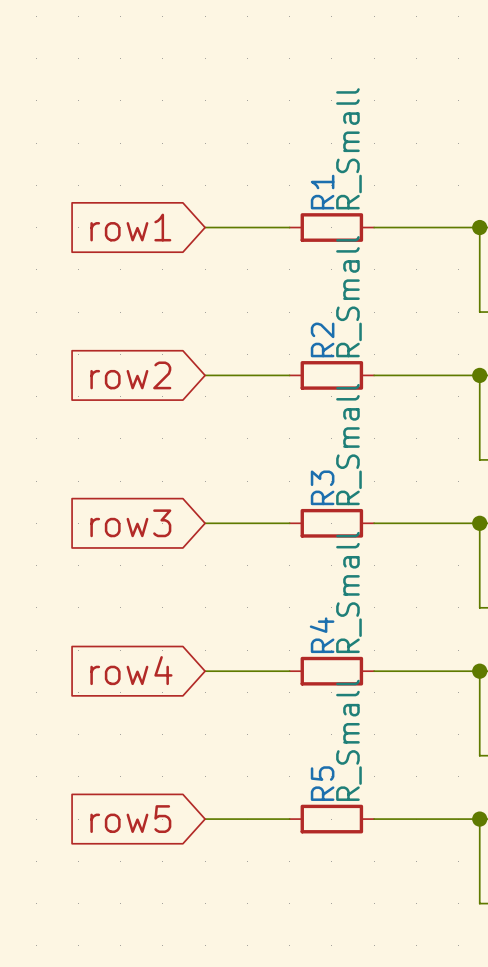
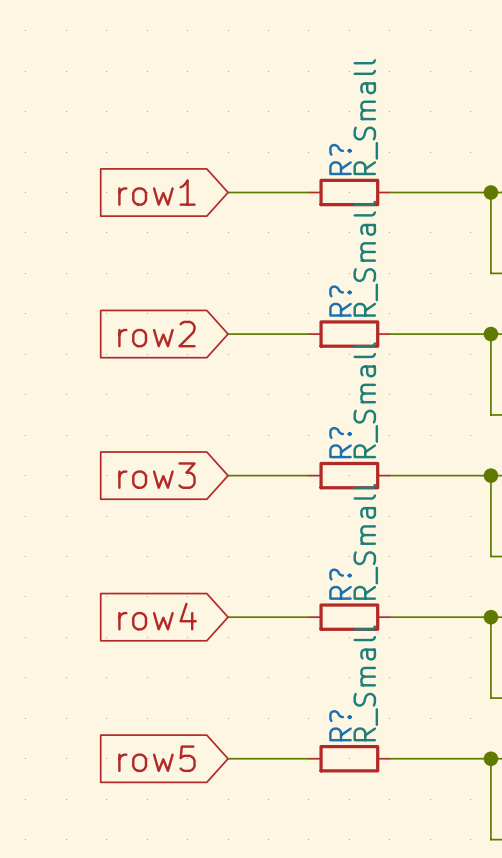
R1 name: R1 (322, 192) -> R? (340, 159)
R2 name: R2 (322, 339) -> R? (340, 301)
R3 name: R3 (322, 487) -> R? (340, 442)
R4 name: R4 (322, 635) -> R? (340, 584)
R5 name: R5 (322, 783) -> R? (340, 725)

